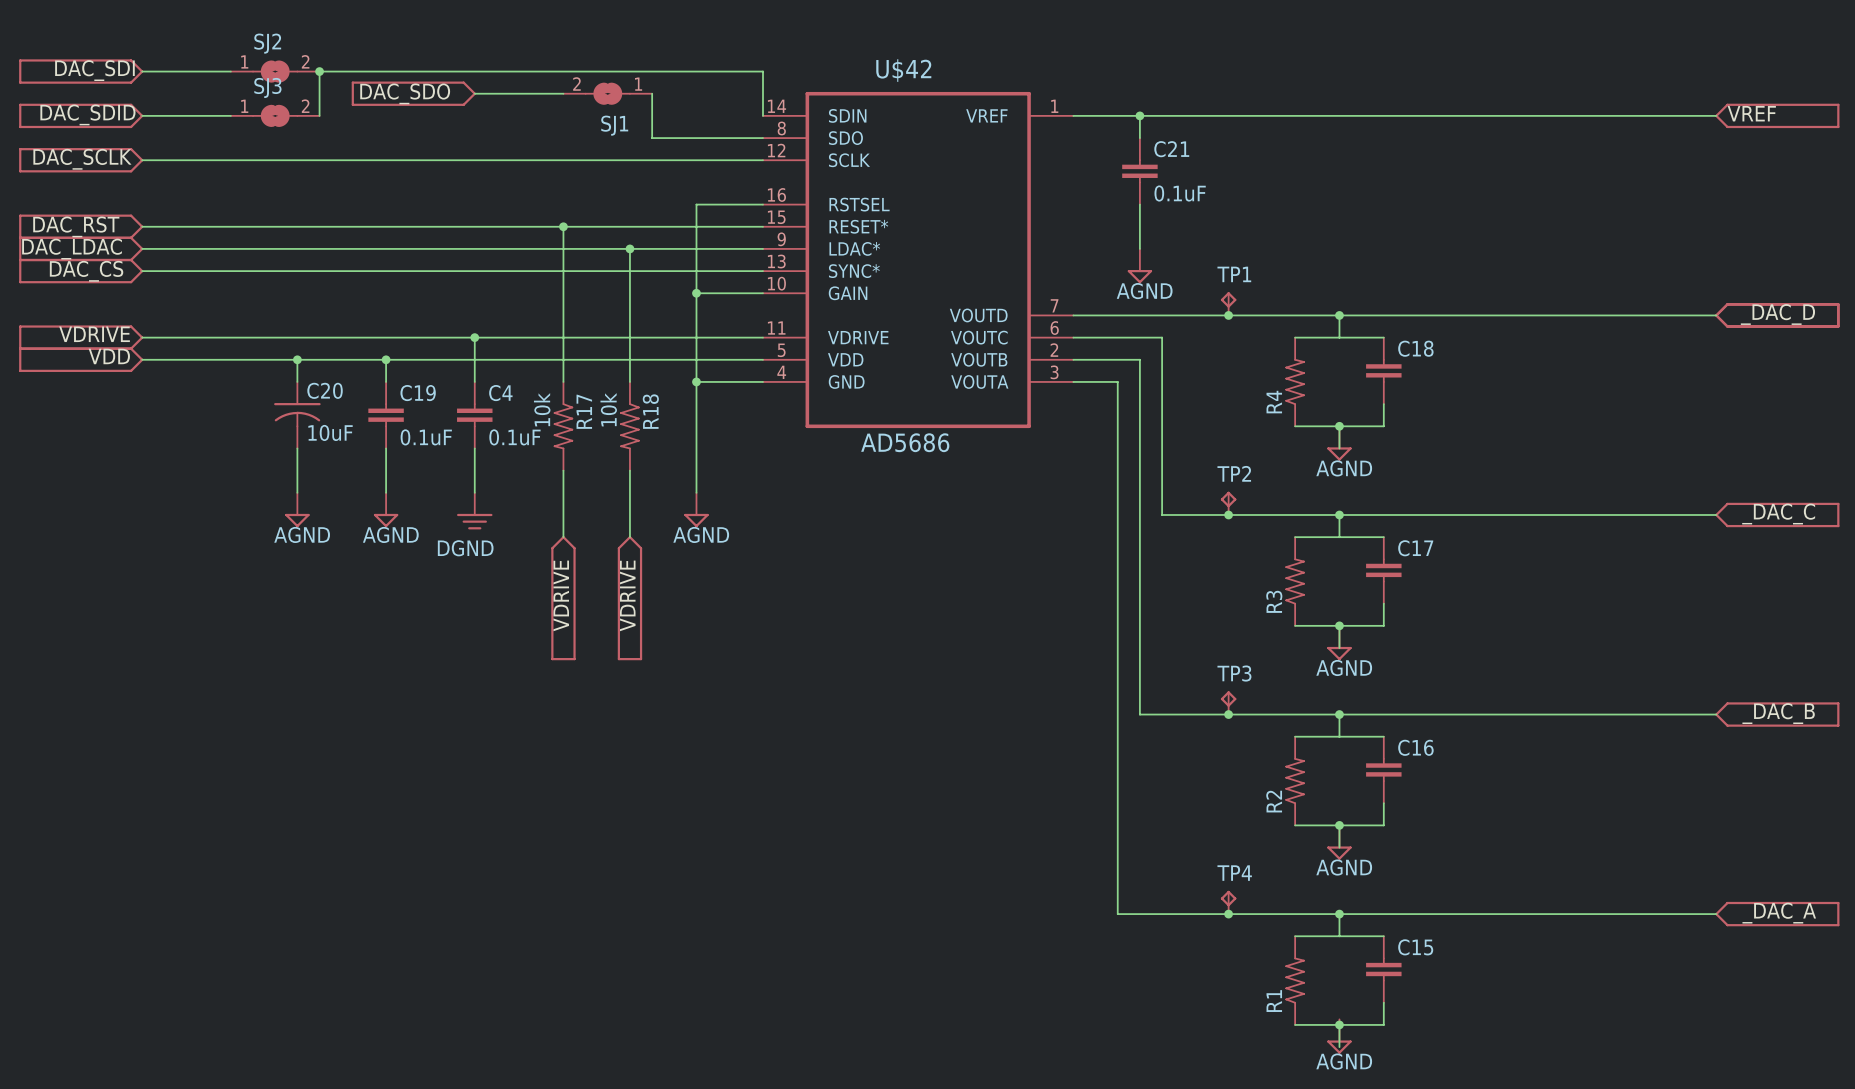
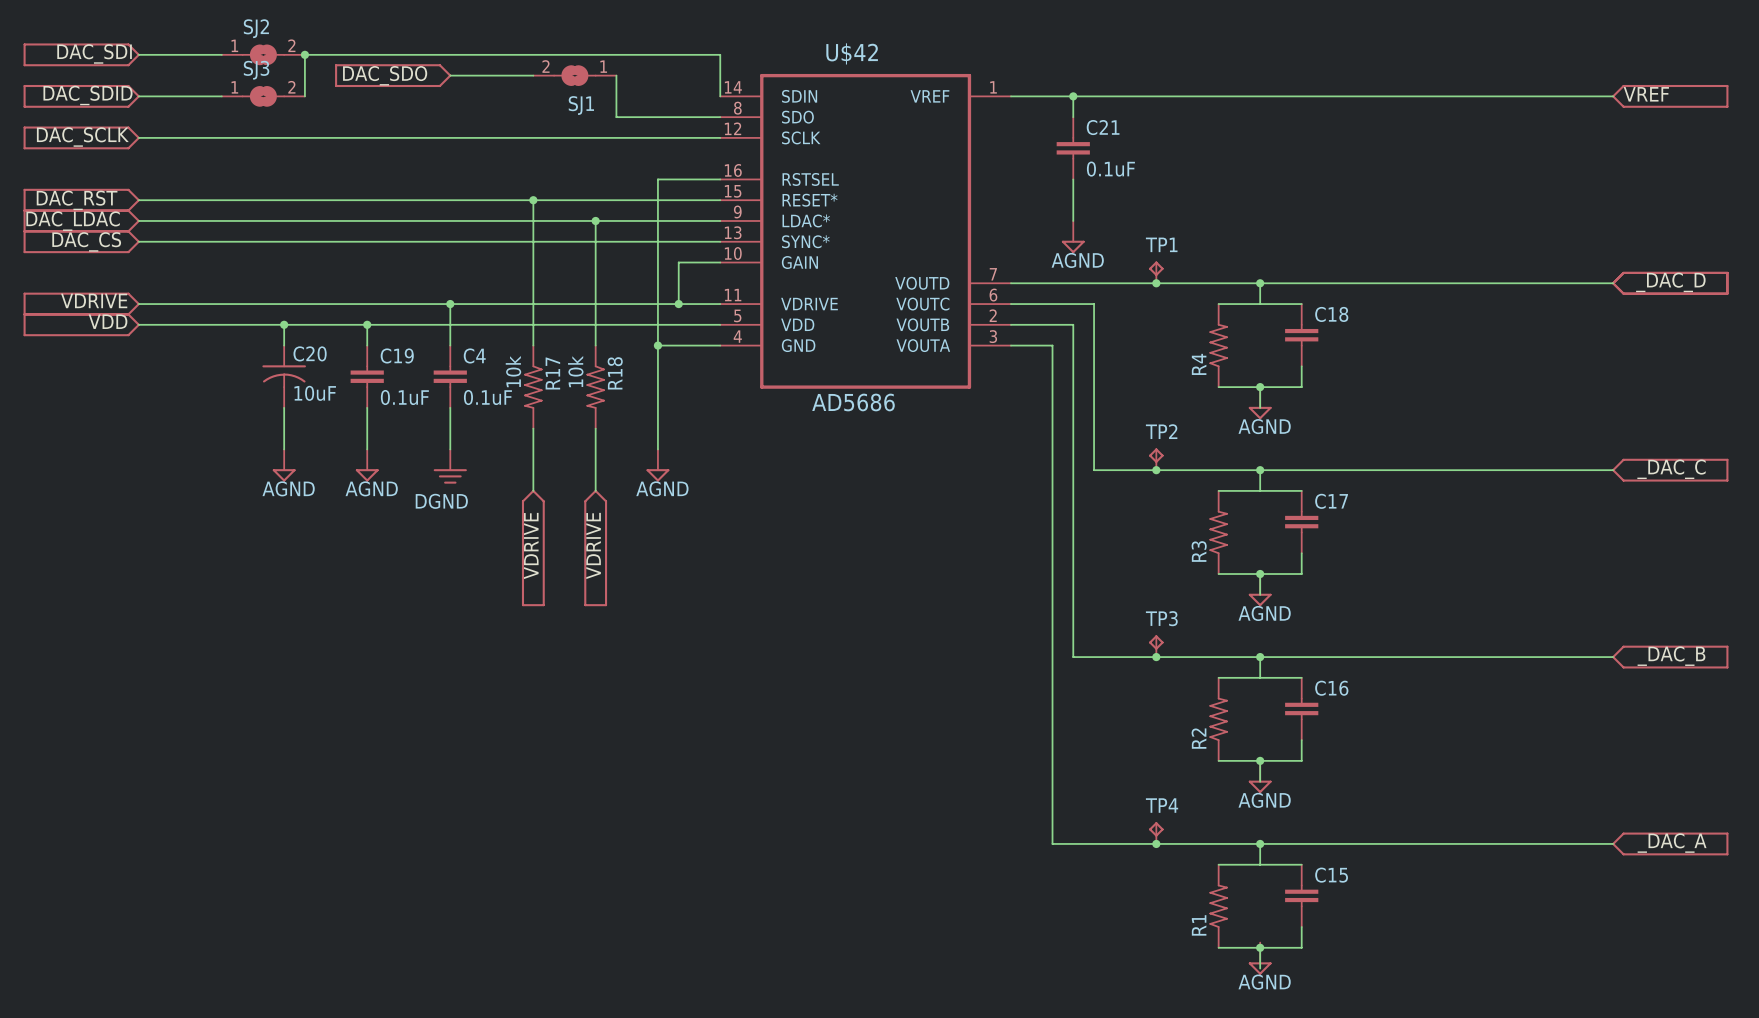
wire: (696, 293) (718, 293) -> (678, 304) (678, 262)
junction position: (696, 293) -> (678, 304)

